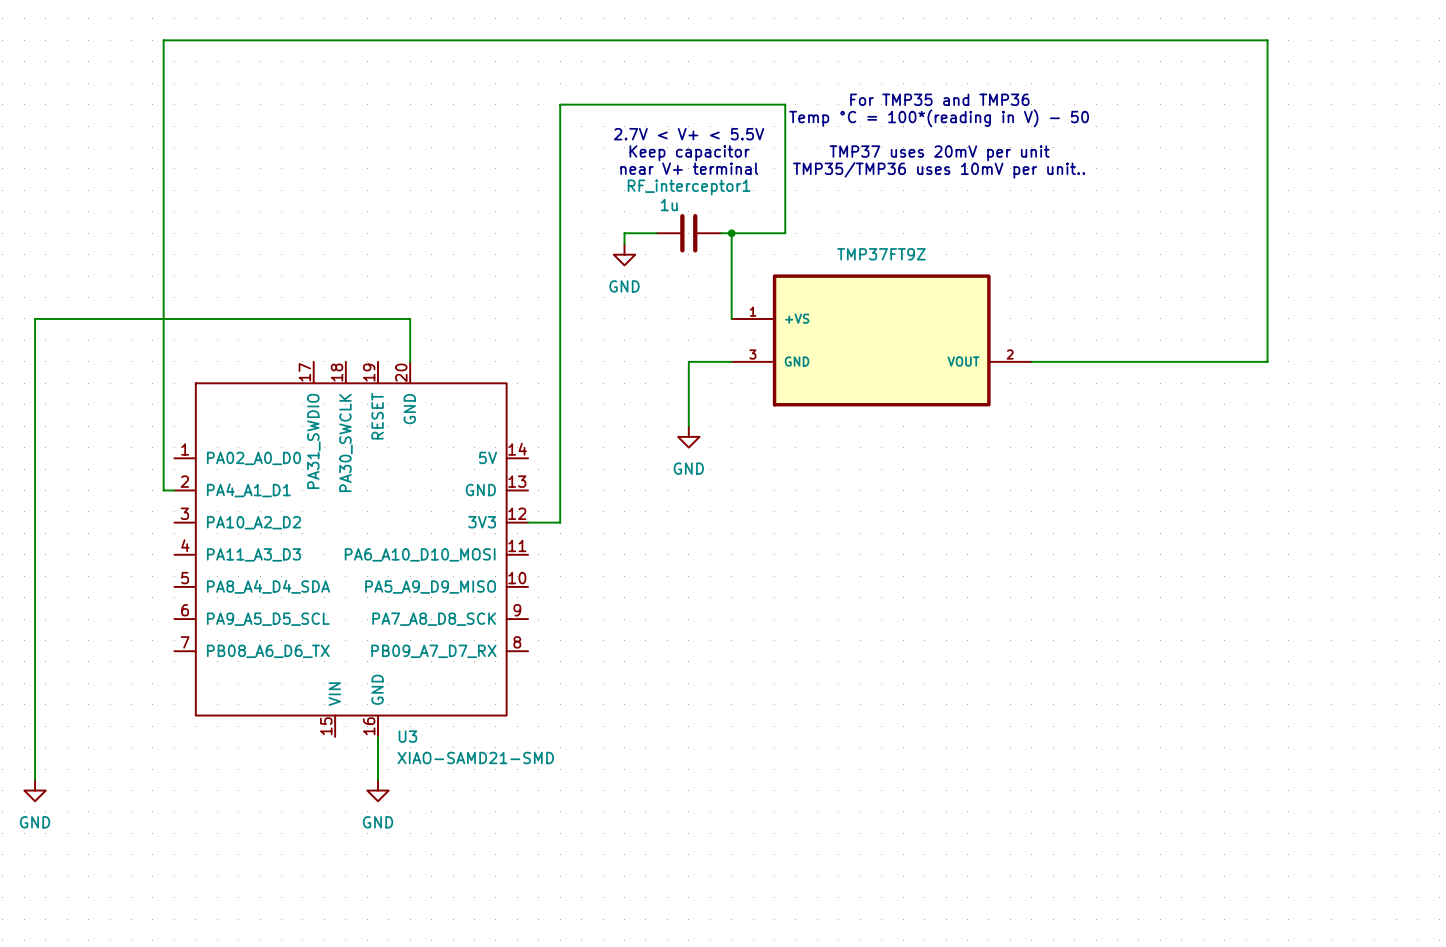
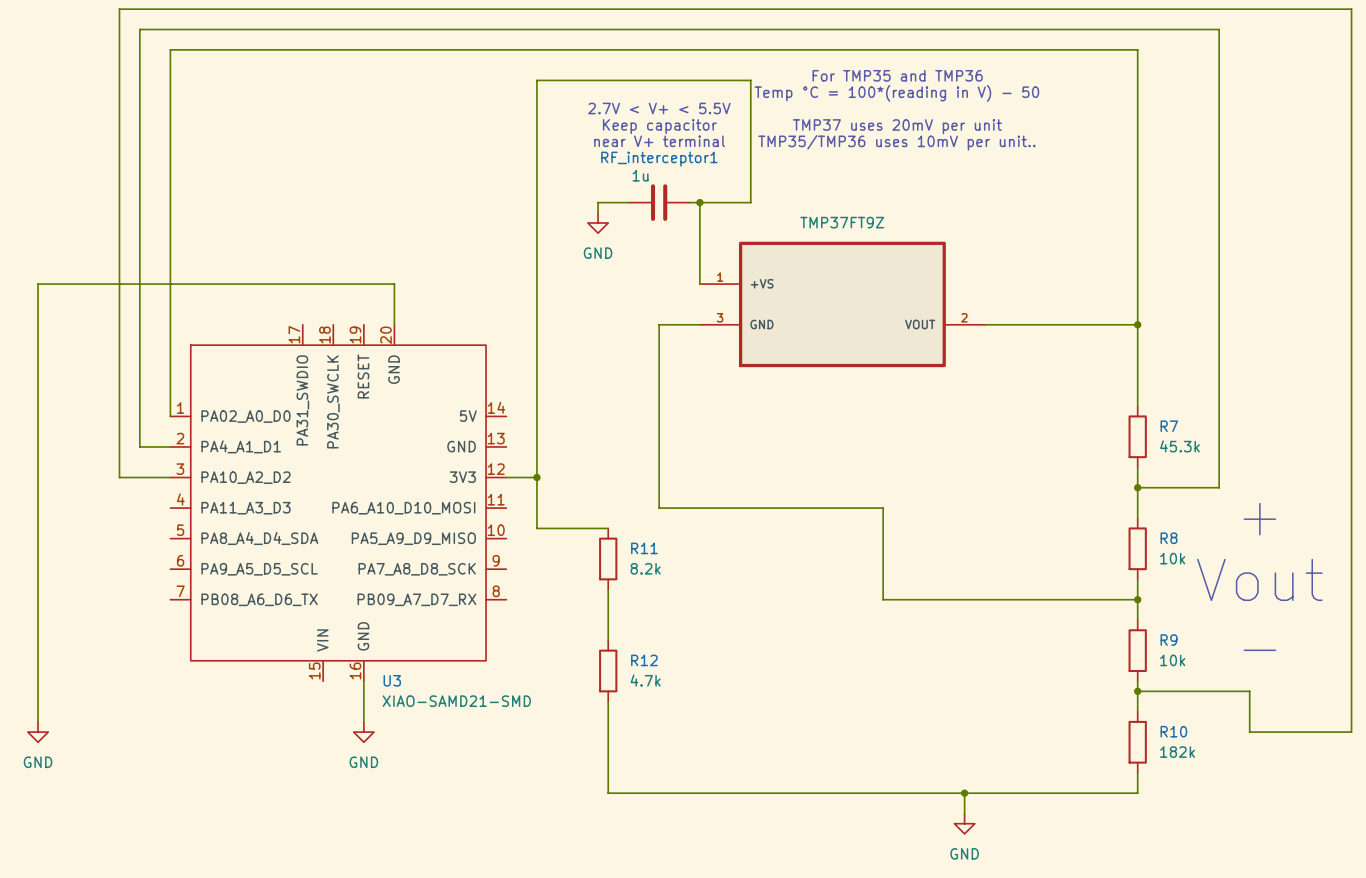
wire: (1192, 361) (1267, 361) (1267, 40) (163, 40) (163, 490) -> (1137, 487) (1219, 487) (1219, 29) (139, 29) (139, 446) (160, 446)
junction: none -> (1137, 324)
wire: none -> (659, 385) (659, 508) (883, 508) (883, 599) (1137, 599)
power symbol: GND (688, 436) -> none
wire: none -> (1137, 406) (1137, 49) (170, 49) (170, 416)
R7: none -> 45.3k (1137, 436)
wire: none -> (1137, 467) (1137, 518)
wire: none -> (170, 477) (119, 477) (119, 9) (1351, 9) (1351, 732) (1249, 732) (1249, 691) (1137, 691)
wire: none -> (536, 477) (536, 528) (608, 528)
junction: none -> (536, 477)
junction: none -> (1137, 487)
text: none -> + (1259, 519)
R8: none -> 10k (1137, 548)
R11: none -> 8.2k (608, 558)
wire: none -> (1137, 579) (1137, 620)
text: none -> Vout (1259, 579)
wire: none -> (608, 589) (608, 640)
junction: none -> (1137, 599)
R9: none -> 10k (1137, 650)
text: none -> - (1259, 650)
R12: none -> 4.7k (608, 670)
wire: none -> (1137, 681) (1137, 711)
junction: none -> (1137, 691)
wire: none -> (608, 701) (608, 793) (1137, 793) (1137, 772)
R10: none -> 182k (1137, 742)
wire: none -> (964, 793) (964, 813)
junction: none -> (964, 793)
power symbol: none -> GND (964, 823)

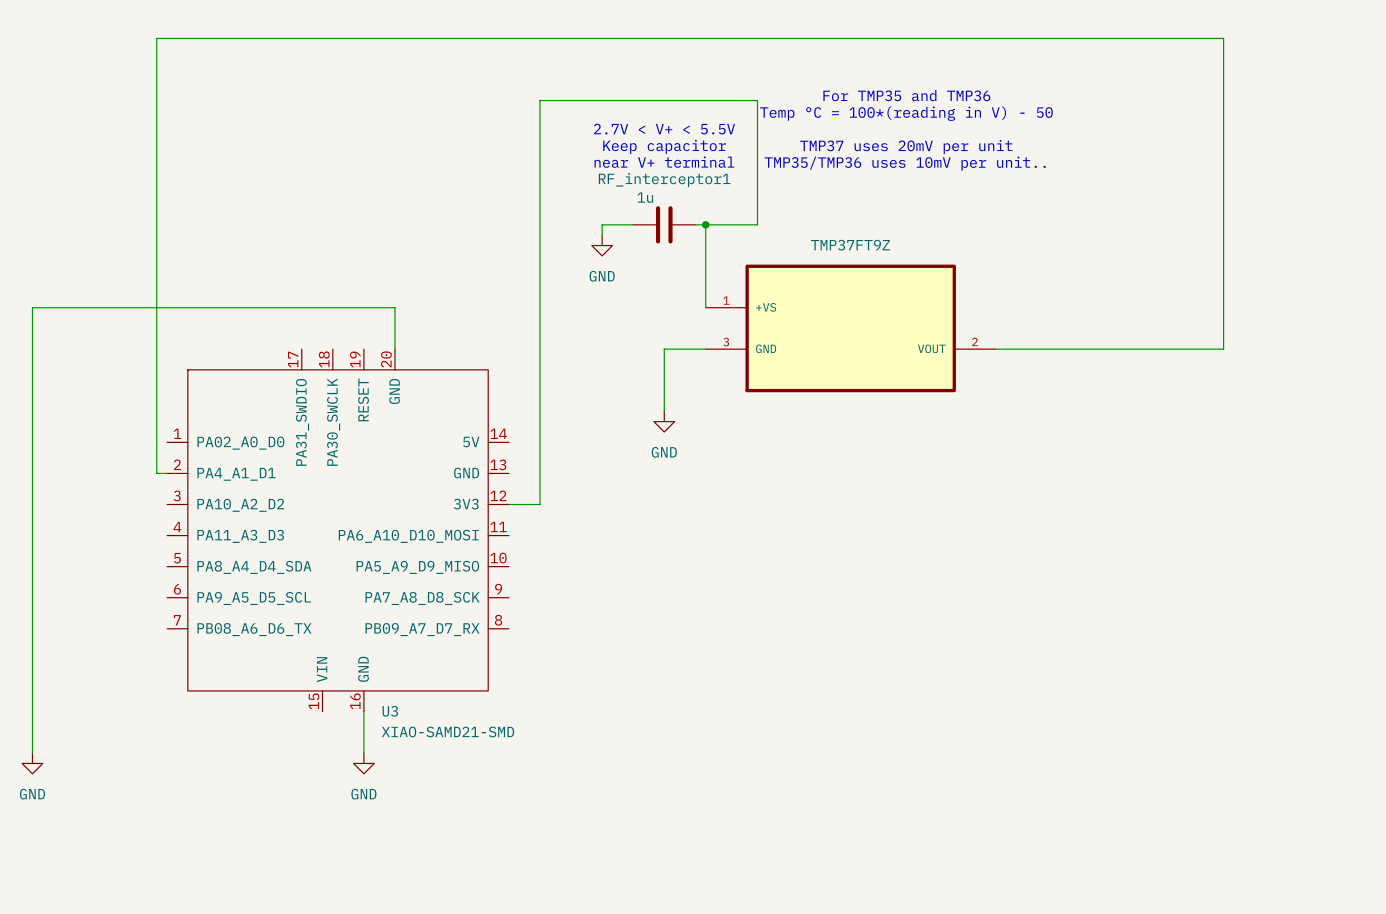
junction: (1137, 324) -> none
wire: (659, 385) (659, 508) (883, 508) (883, 599) (1137, 599) -> none
power symbol: none -> GND (664, 421)
wire: (1137, 406) (1137, 49) (170, 49) (170, 416) -> none
R7: 45.3k (1137, 436) -> none
wire: (160, 446) (139, 446) (139, 29) (1219, 29) (1219, 487) (1137, 487) -> (156, 473) (156, 38) (1223, 38) (1223, 349) (1151, 349)
wire: (1137, 467) (1137, 518) -> none
wire: (170, 477) (119, 477) (119, 9) (1351, 9) (1351, 732) (1249, 732) (1249, 691) (1137, 691) -> none
wire: (536, 477) (536, 528) (608, 528) -> none
junction: (536, 477) -> none
junction: (1137, 487) -> none
text: + (1259, 519) -> none
R8: 10k (1137, 548) -> none
R11: 8.2k (608, 558) -> none
wire: (1137, 579) (1137, 620) -> none
text: Vout (1259, 579) -> none
wire: (608, 589) (608, 640) -> none
junction: (1137, 599) -> none
R9: 10k (1137, 650) -> none
text: - (1259, 650) -> none
R12: 4.7k (608, 670) -> none
wire: (1137, 681) (1137, 711) -> none
junction: (1137, 691) -> none
wire: (608, 701) (608, 793) (1137, 793) (1137, 772) -> none
R10: 182k (1137, 742) -> none
wire: (964, 793) (964, 813) -> none
junction: (964, 793) -> none
power symbol: GND (964, 823) -> none

